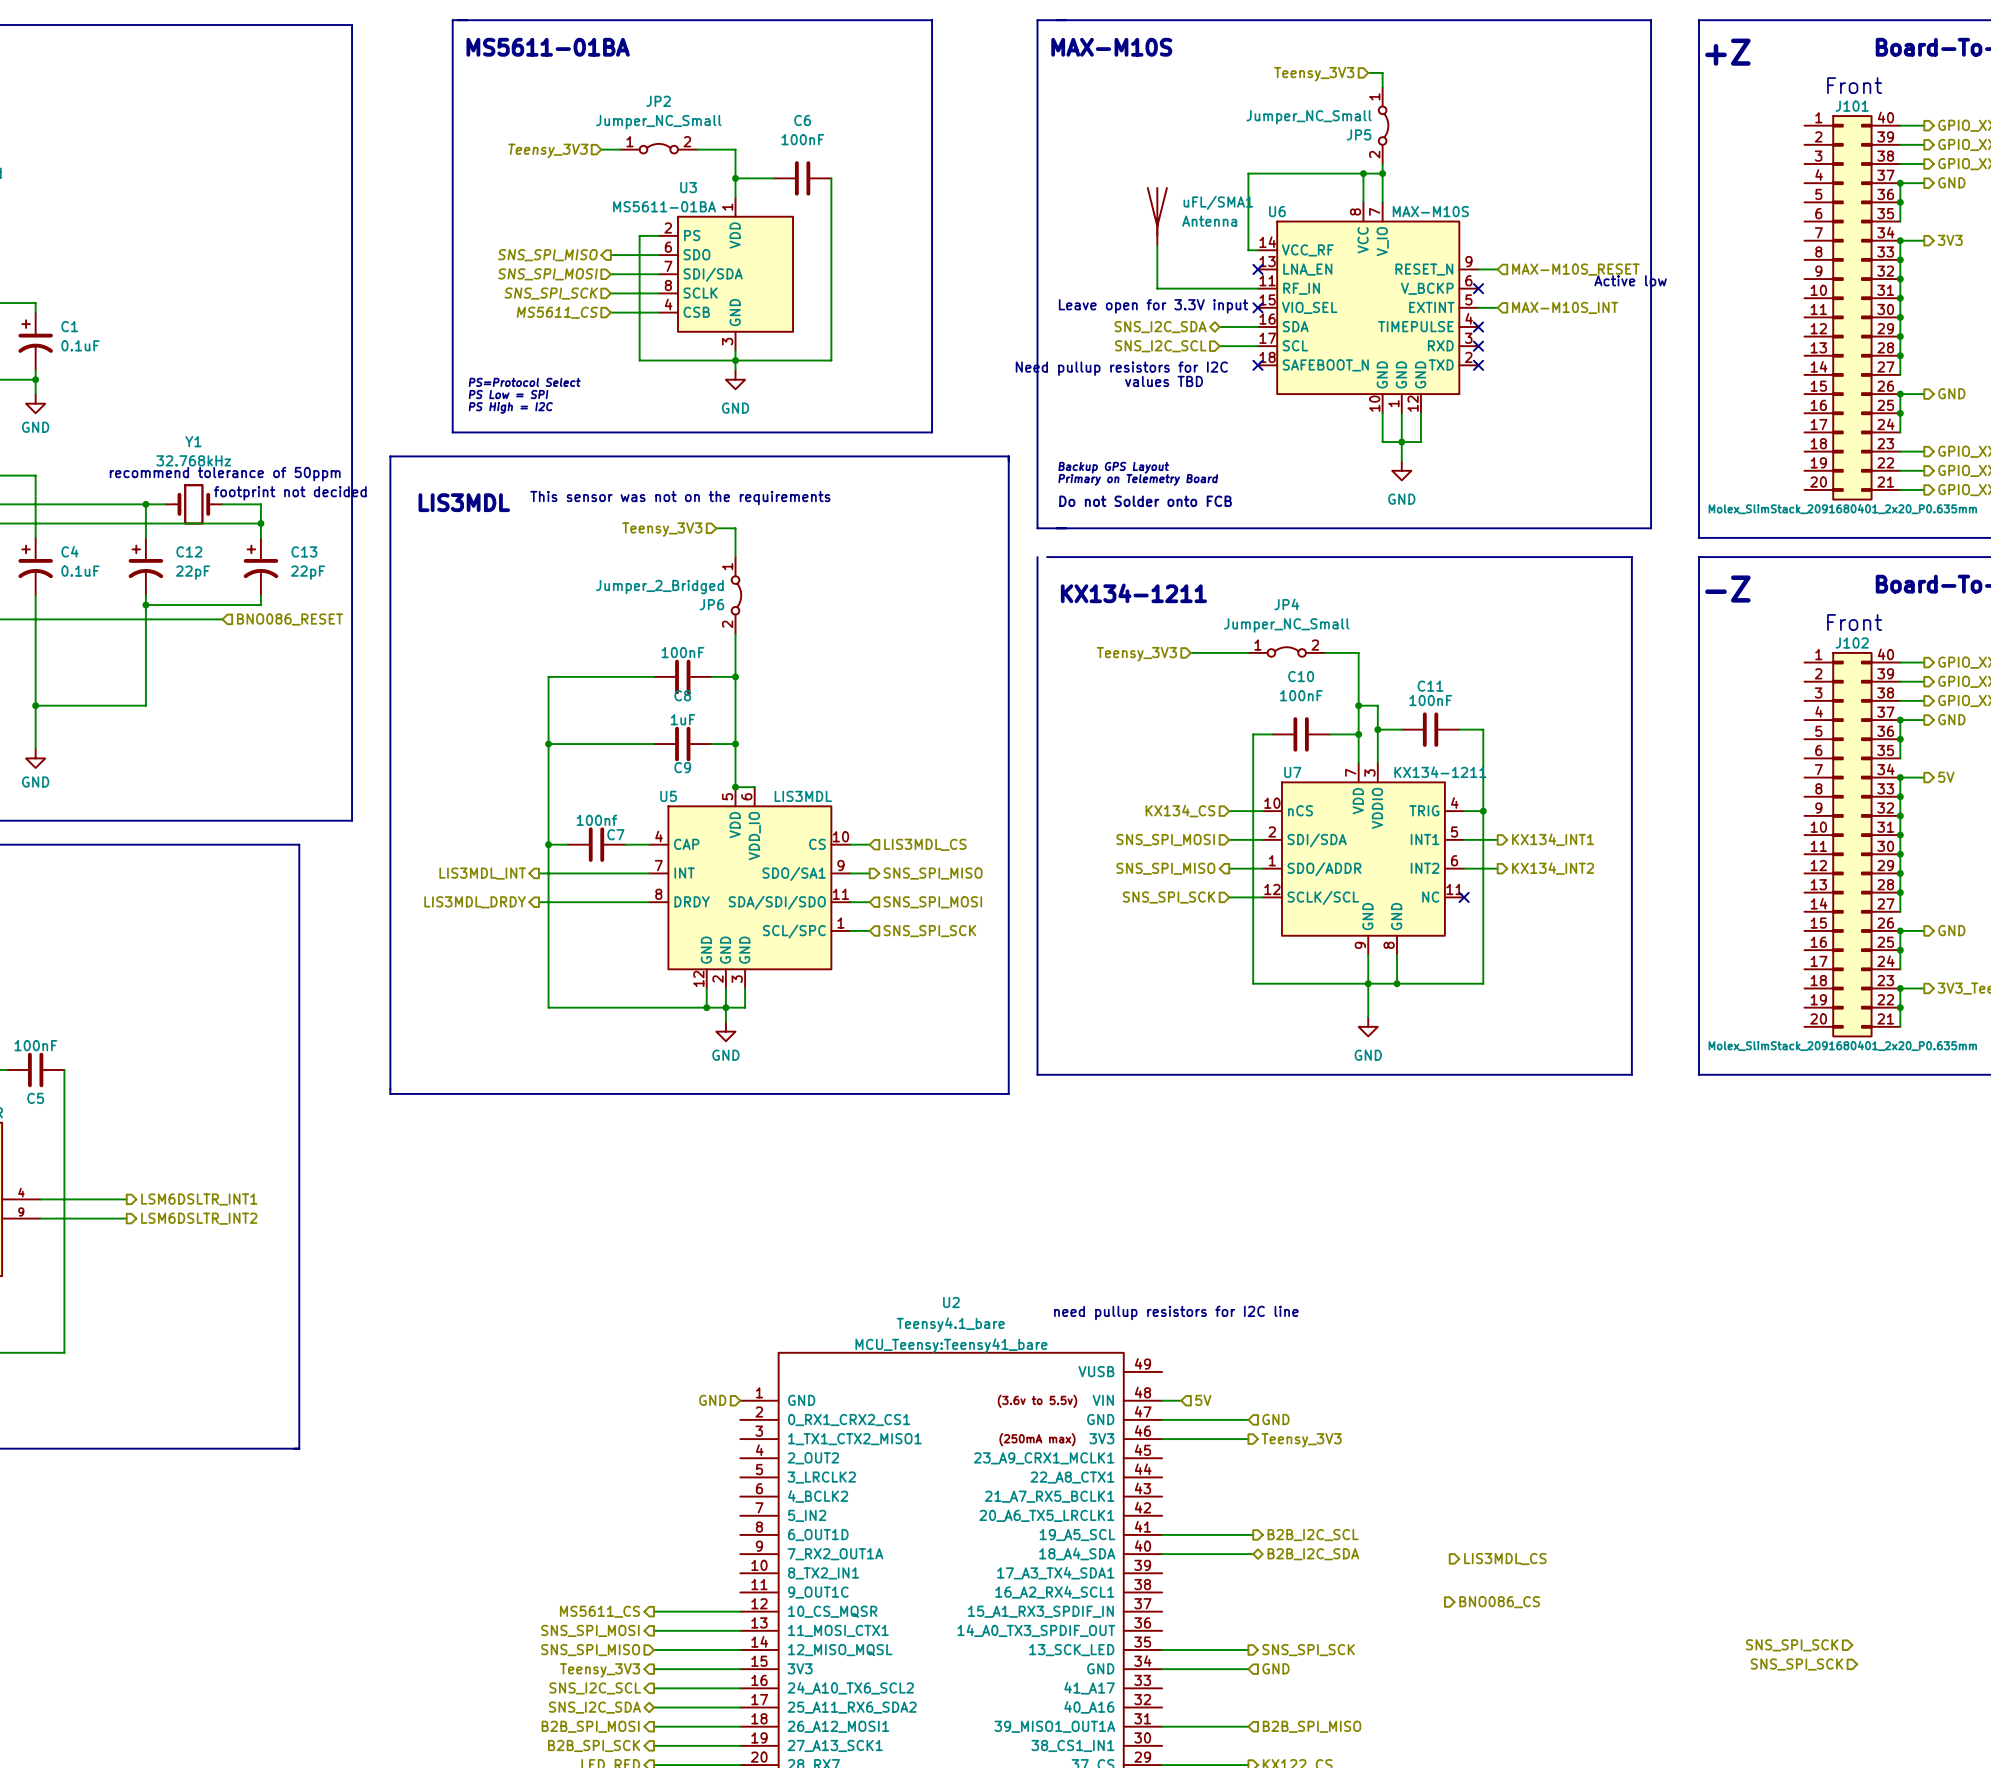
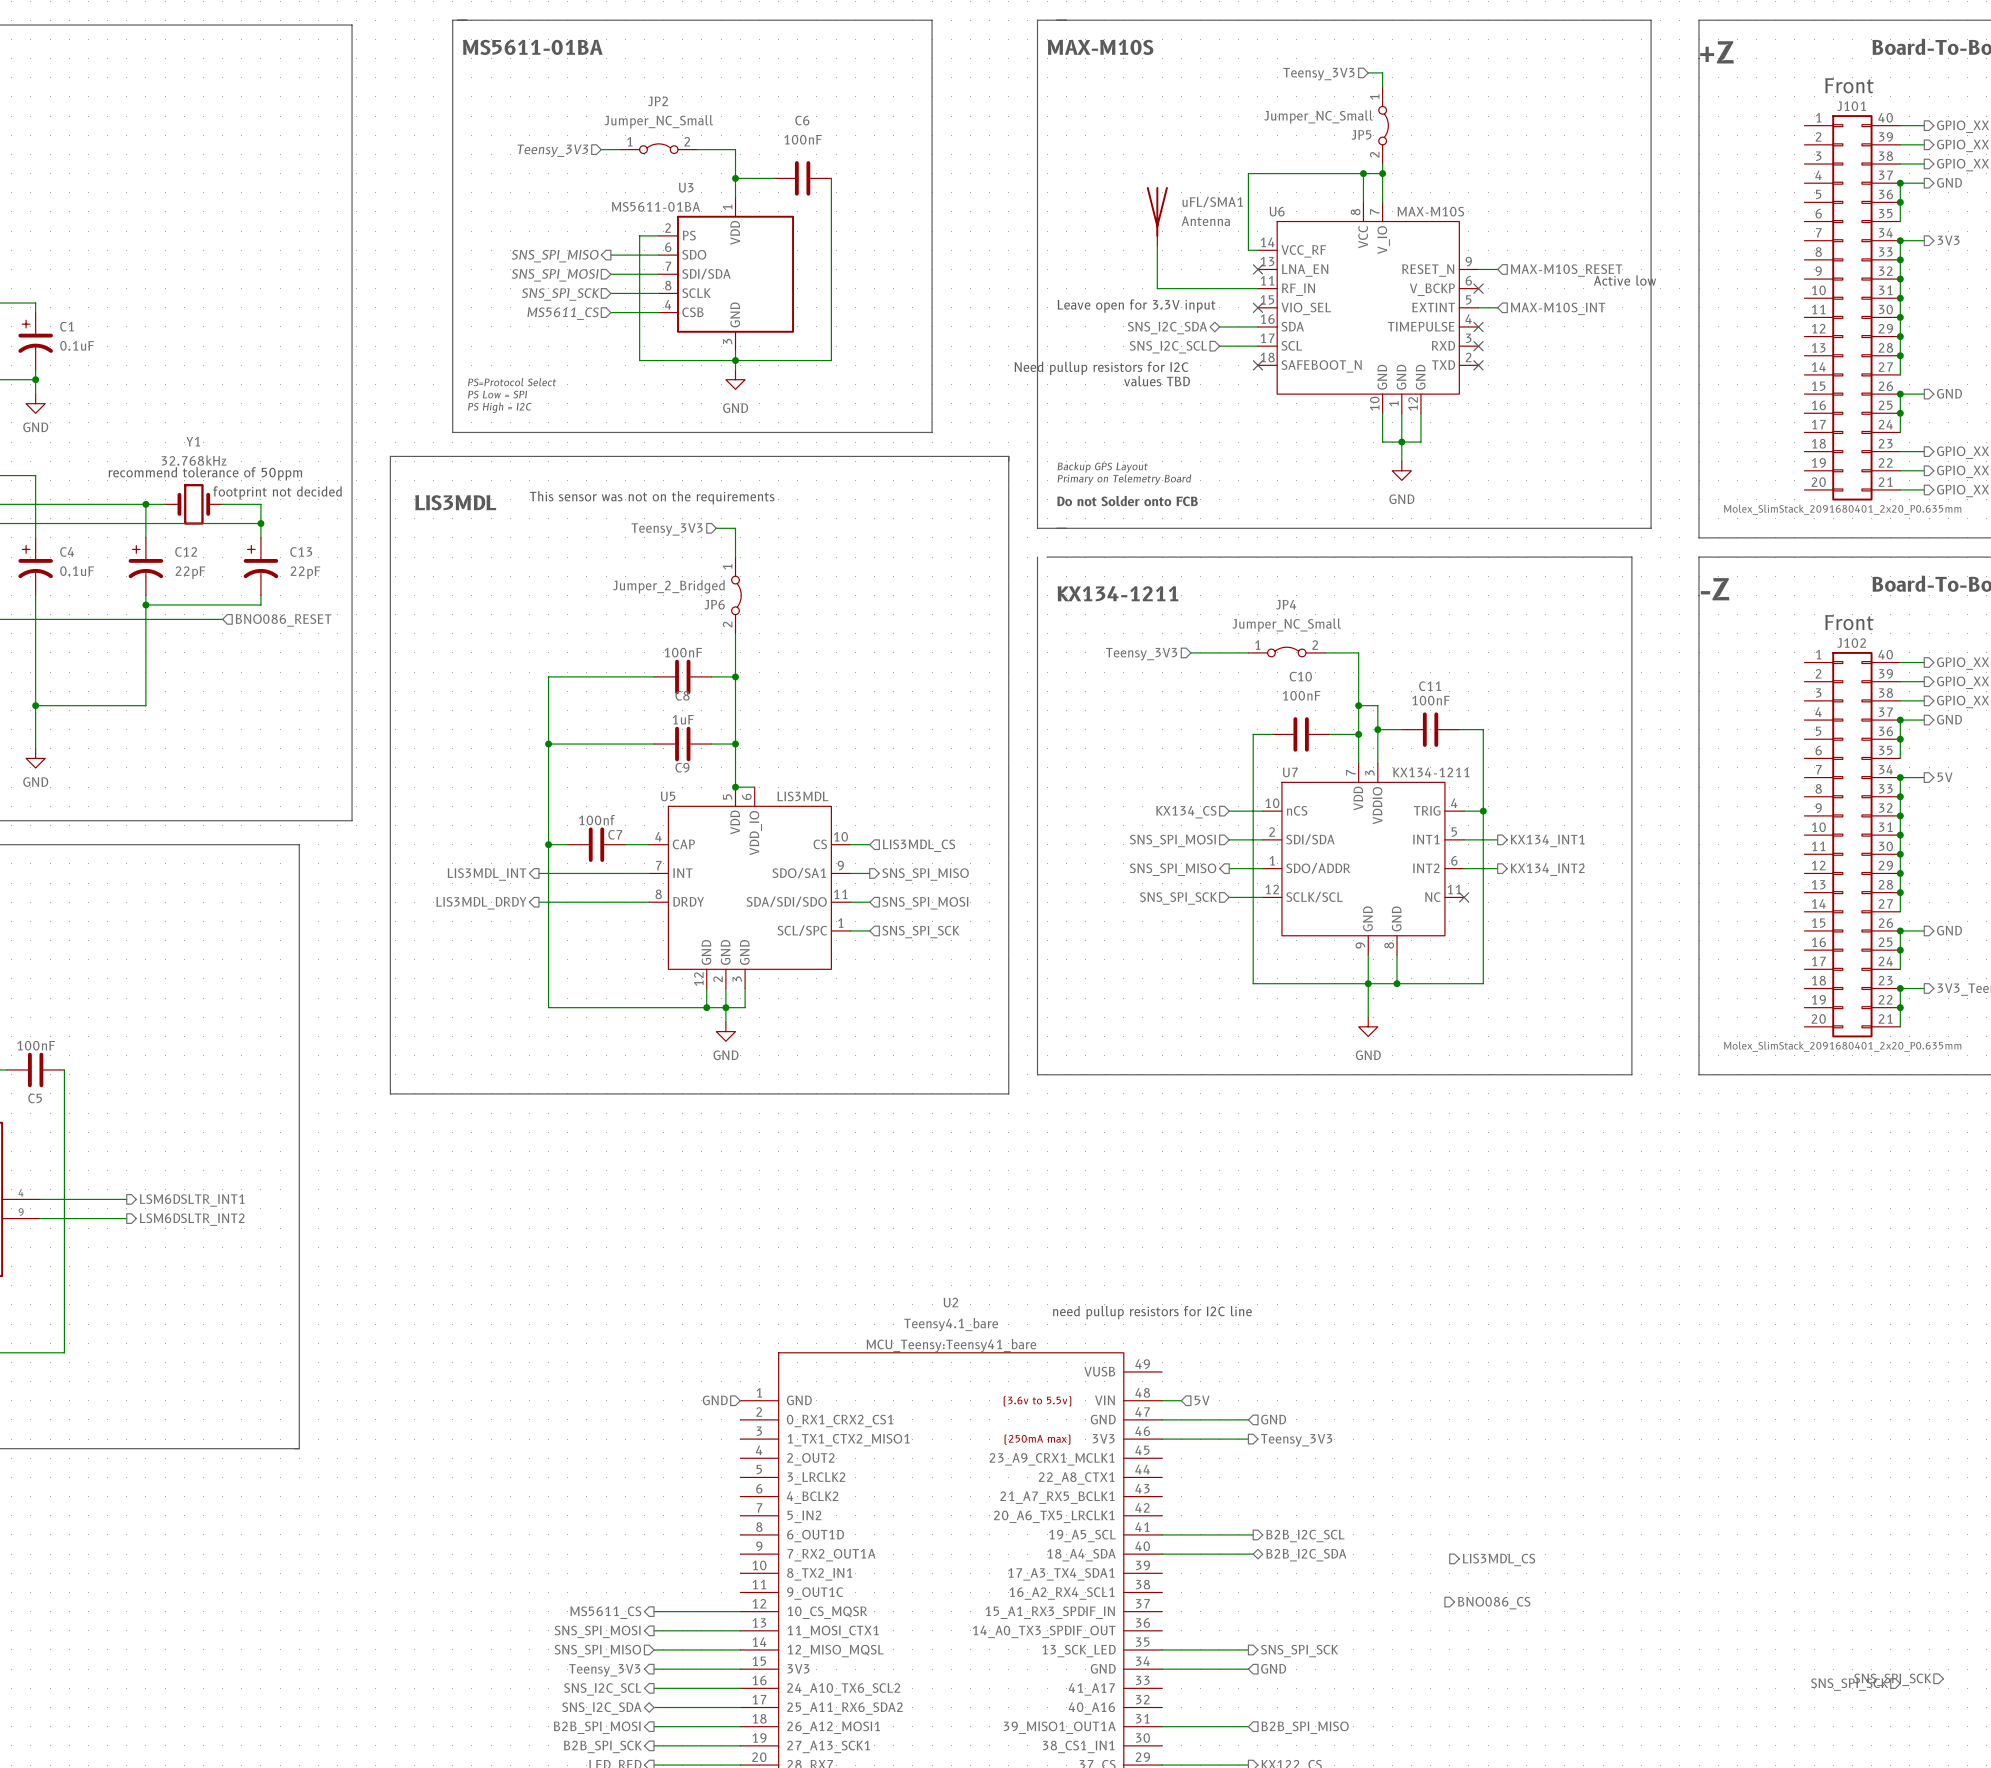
hierarchical label: SNS_SPI_SCK (1792, 1645) -> none
hierarchical label: SNS_SPI_SCK (1797, 1664) -> none
hierarchical label: none -> SNS_SPI_SCK (1892, 1679)
hierarchical label: none -> SNS_SPI_SCK (1849, 1684)

